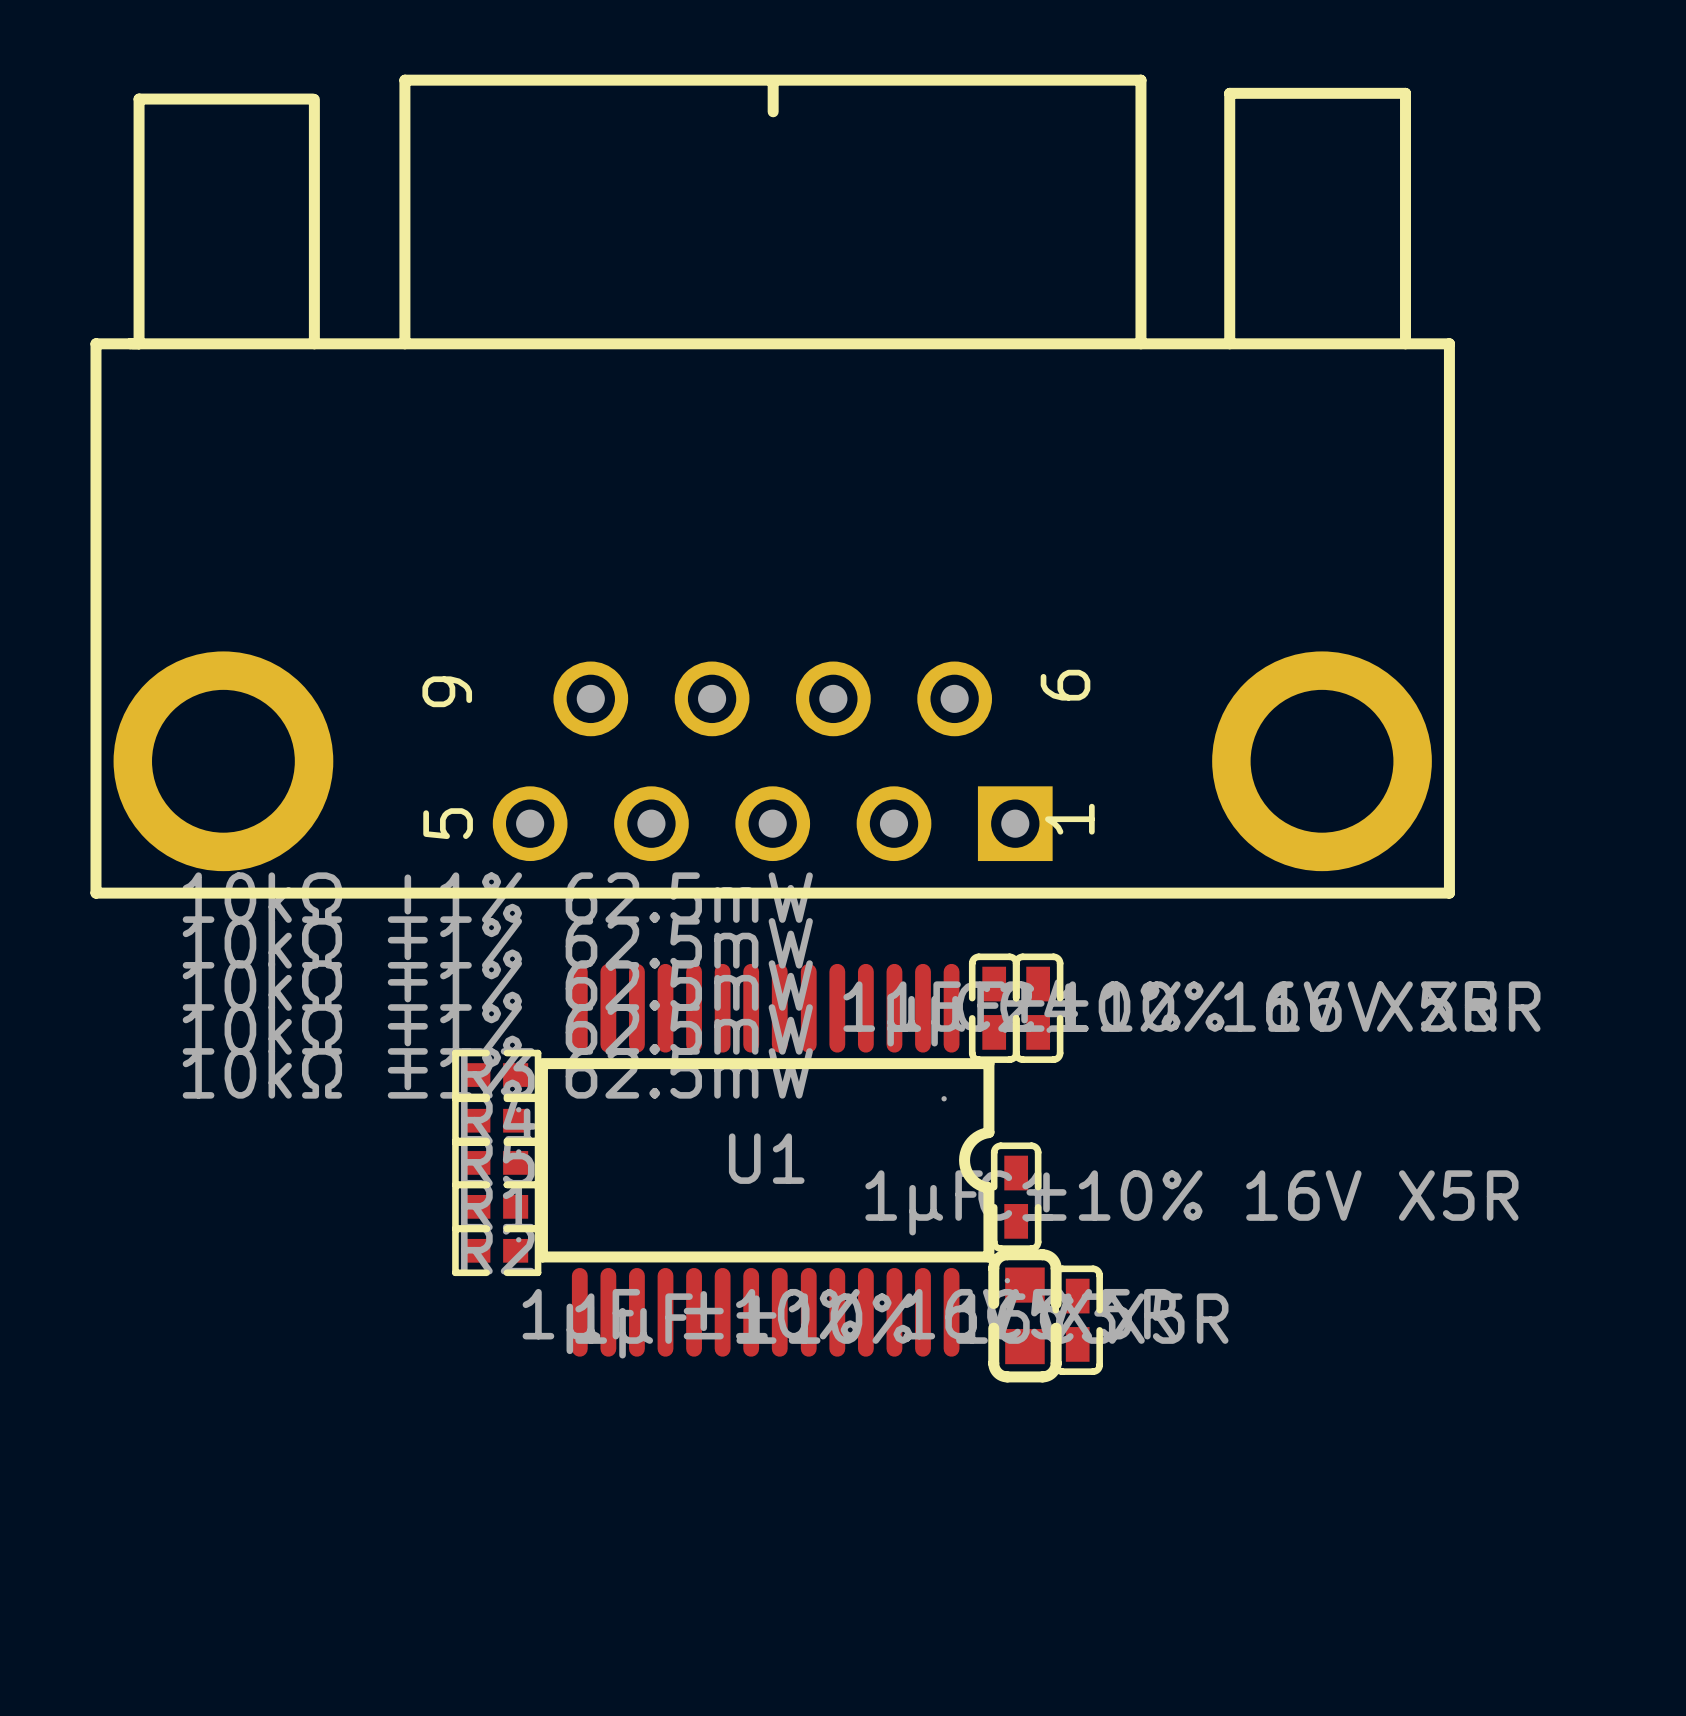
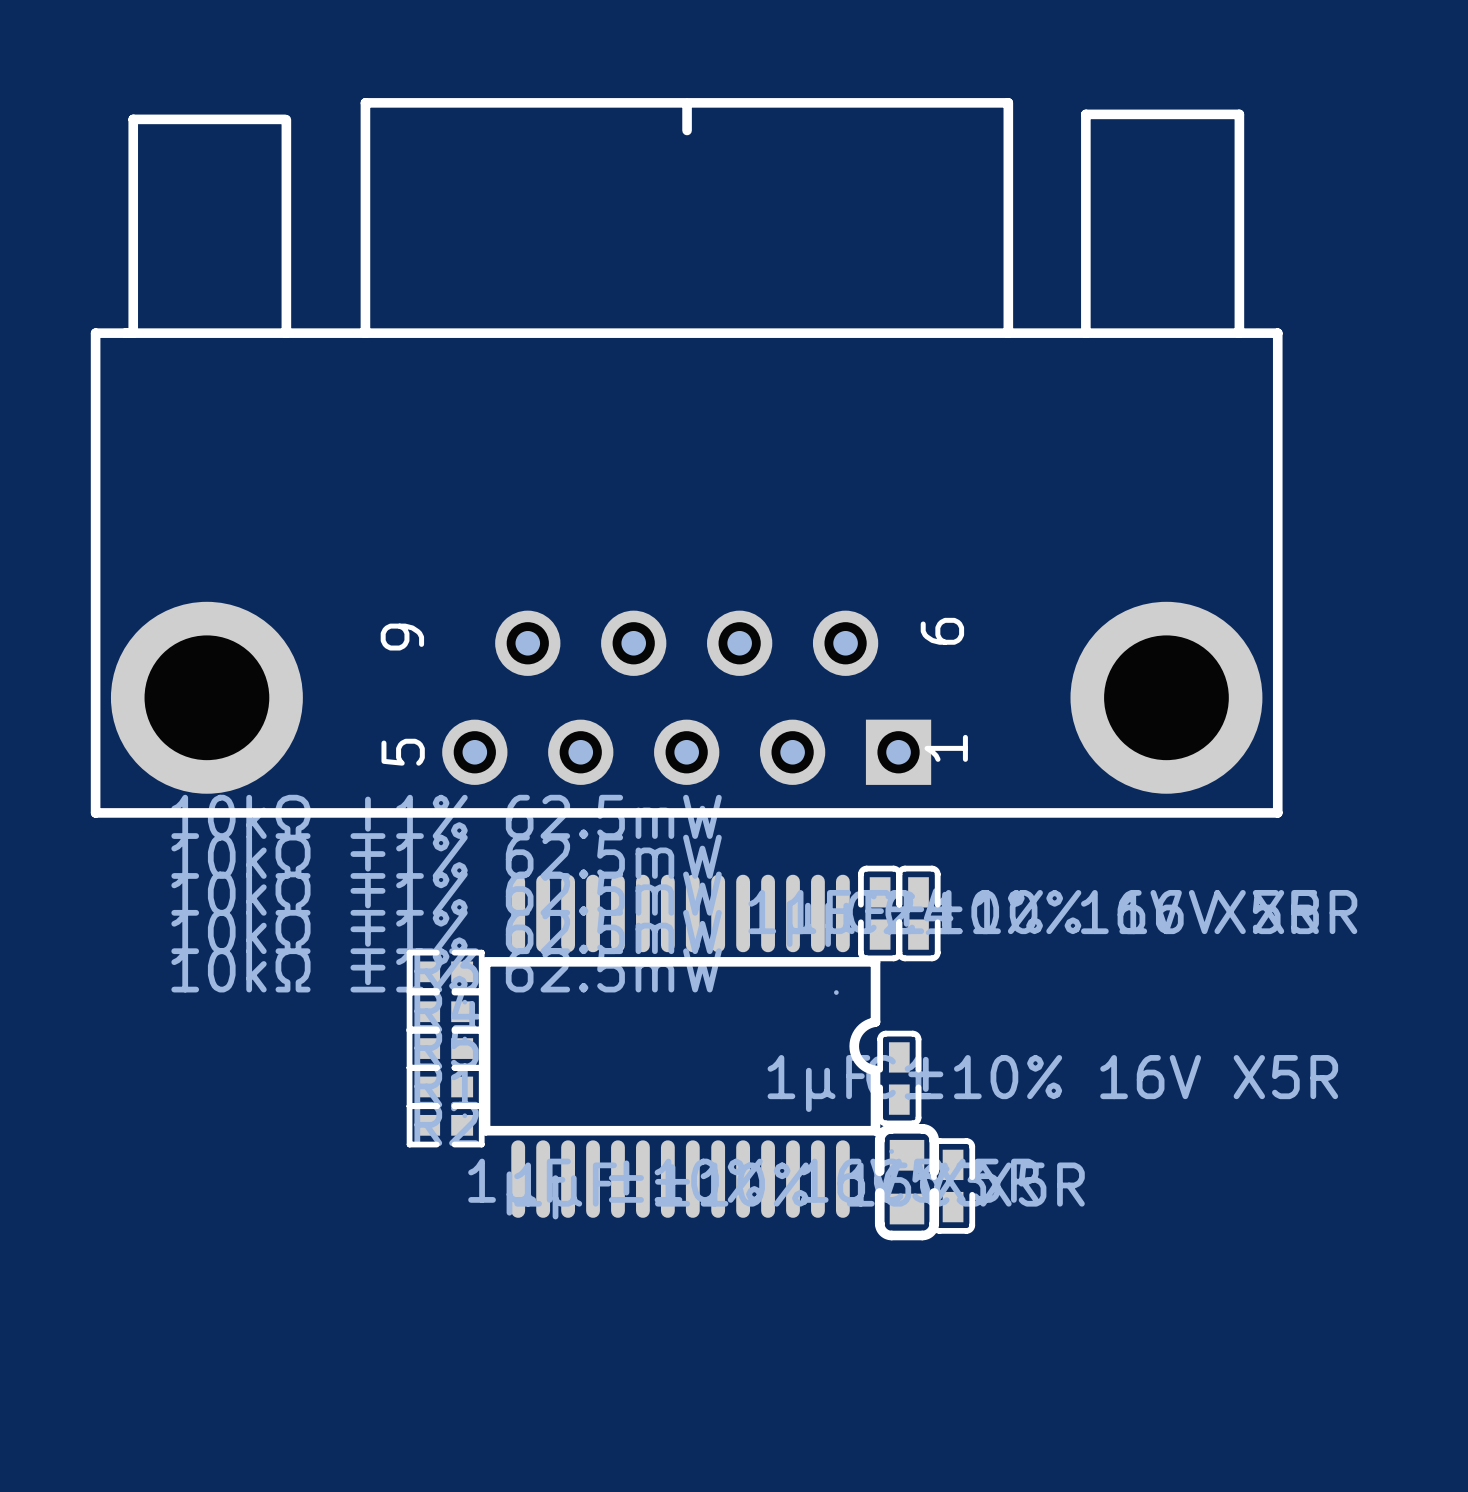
U1 name: U1 (766, 1158) -> none

